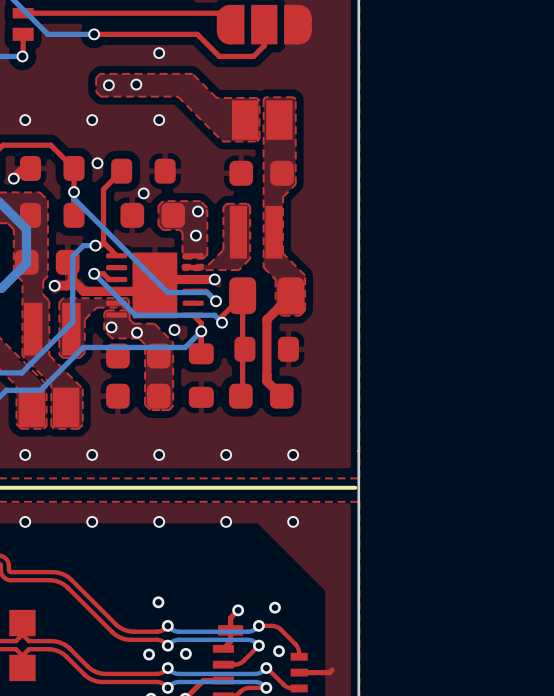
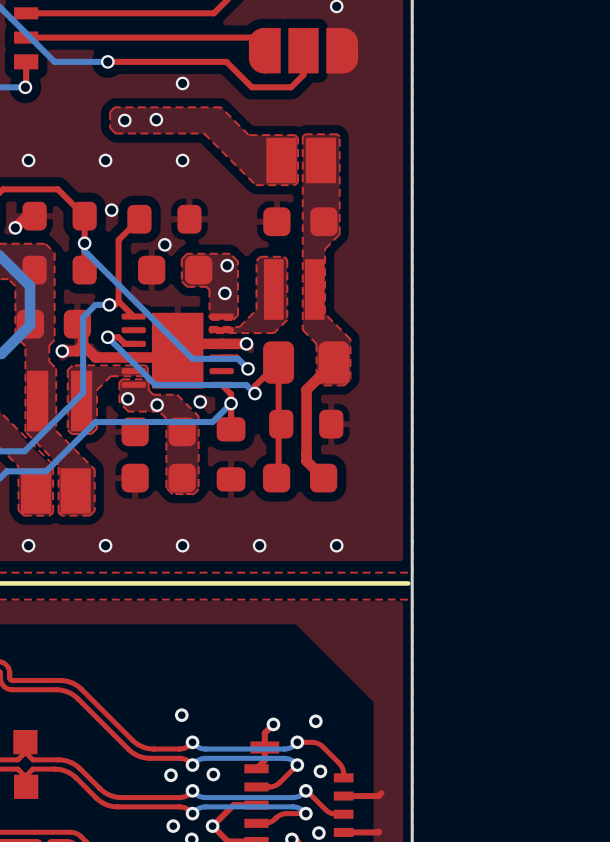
via: (25, 521) -> none
via: (92, 521) -> none
via: (159, 521) -> none
via: (226, 521) -> none
via: (293, 521) -> none
part footprint: [9, 609, 36, 637] -> [13, 730, 38, 755]
part footprint: [9, 654, 36, 682] -> [14, 774, 39, 799]

